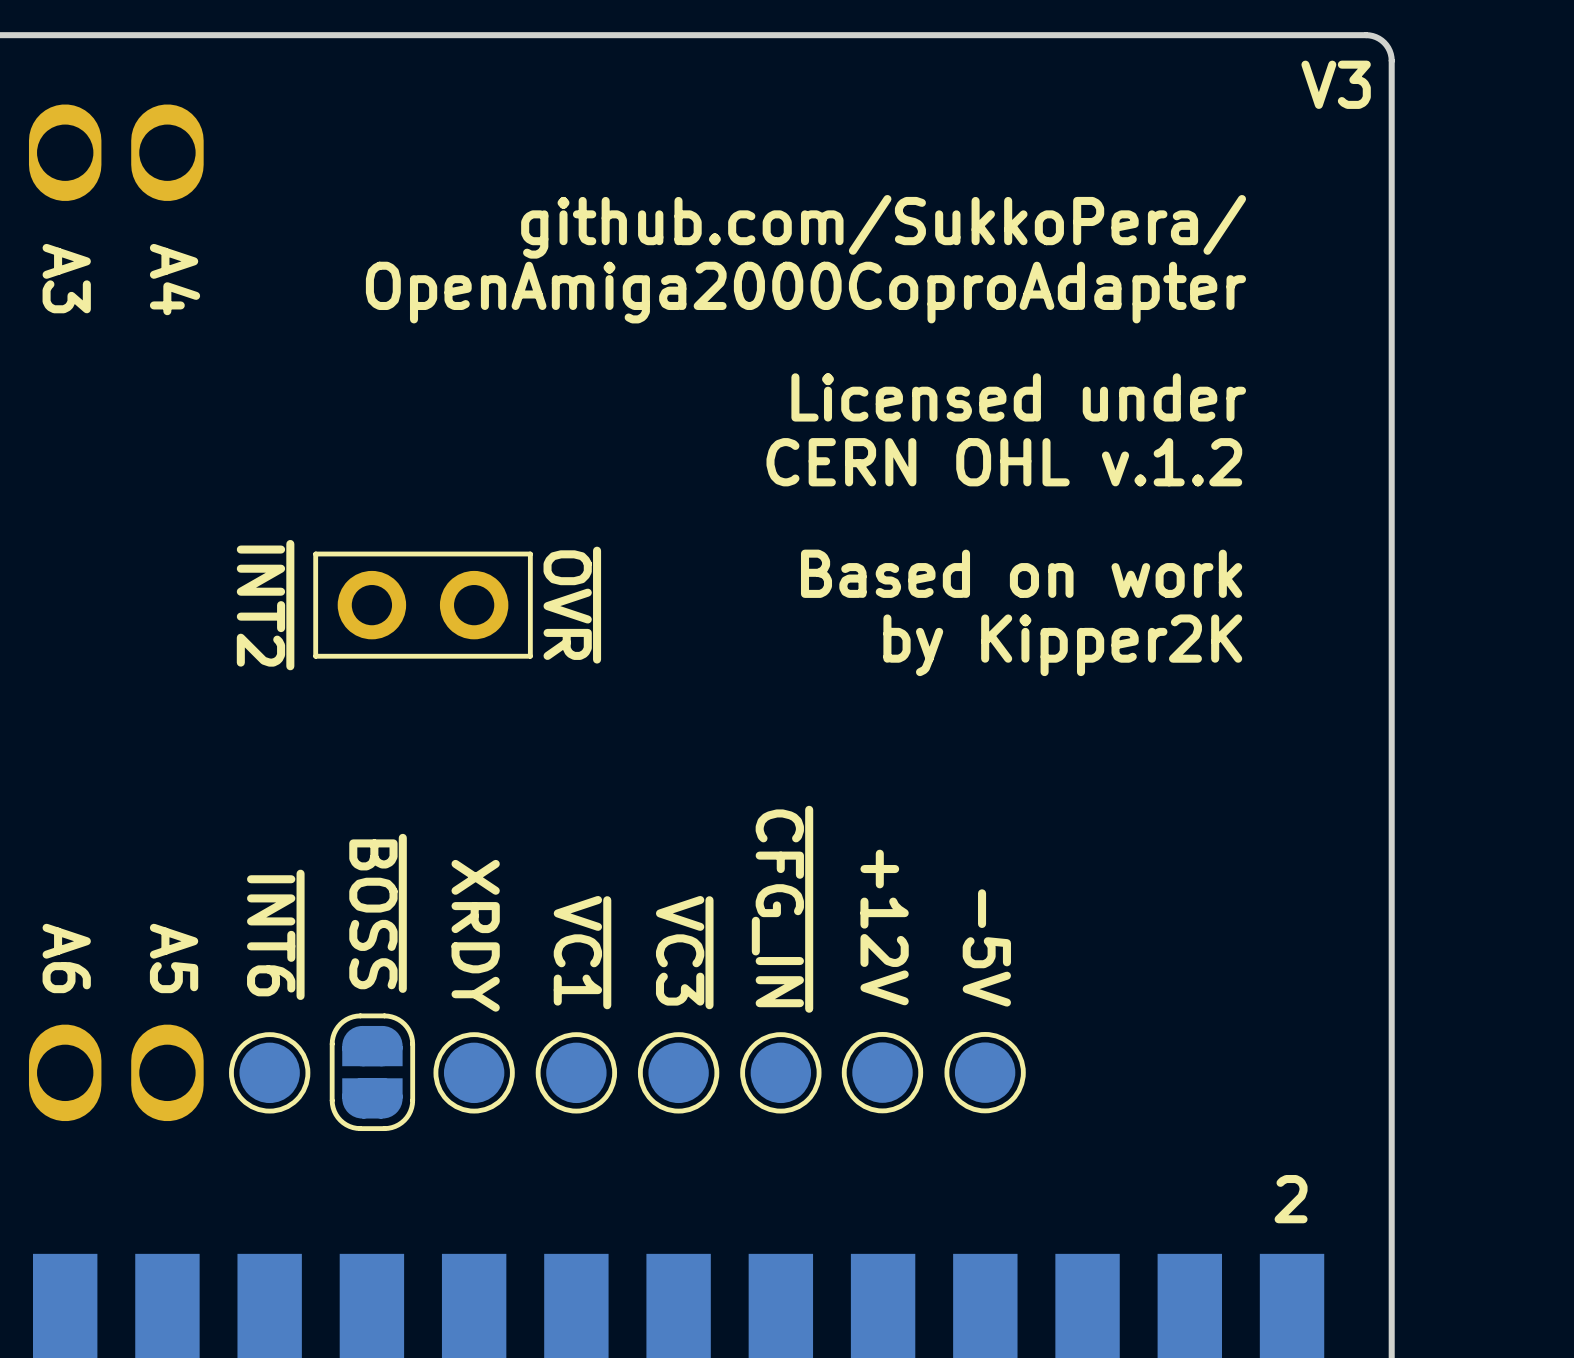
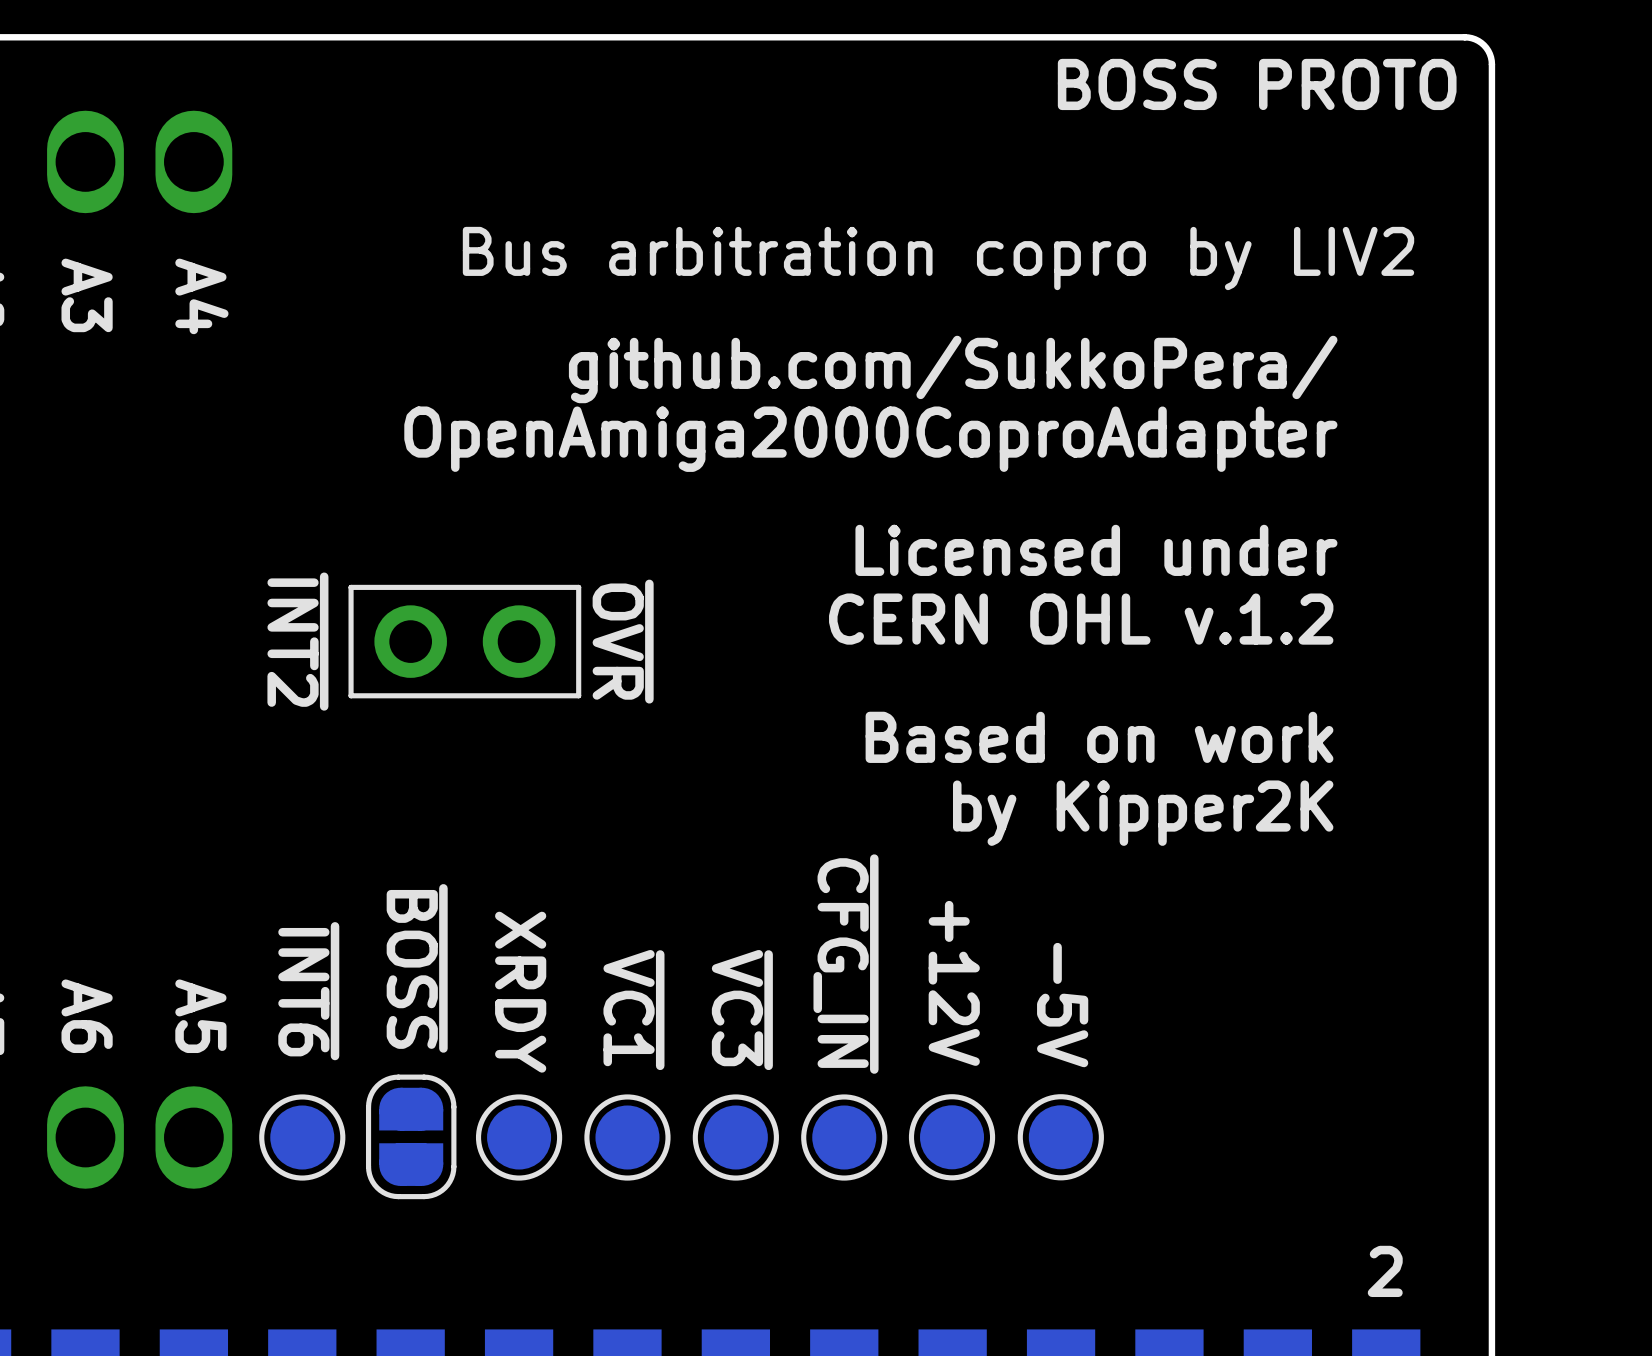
text: none -> BOSS PROTO (1257, 84)
text: V3 (1336, 84) -> none
text position: github.com/SukkoPera/ (883, 226) -> github.com/SukkoPera/ (953, 369)
text: none -> Bus arbitration copro by LIV2 (938, 258)
text: OpenAmiga2000CoproAdapter (805, 292) -> none
text: Licensed under (1018, 397) -> OpenAmiga2000CoproAdapter (870, 439)
text: CERN OHL v.1.2 (1004, 462) -> none
text: none -> Licensed under (1096, 550)
text: Based on work (1021, 573) -> CERN OHL v.1.2 (1081, 619)
text position: by Kipper2K (1062, 645) -> by Kipper2K (1143, 813)
text: none -> Based on work (1099, 737)

